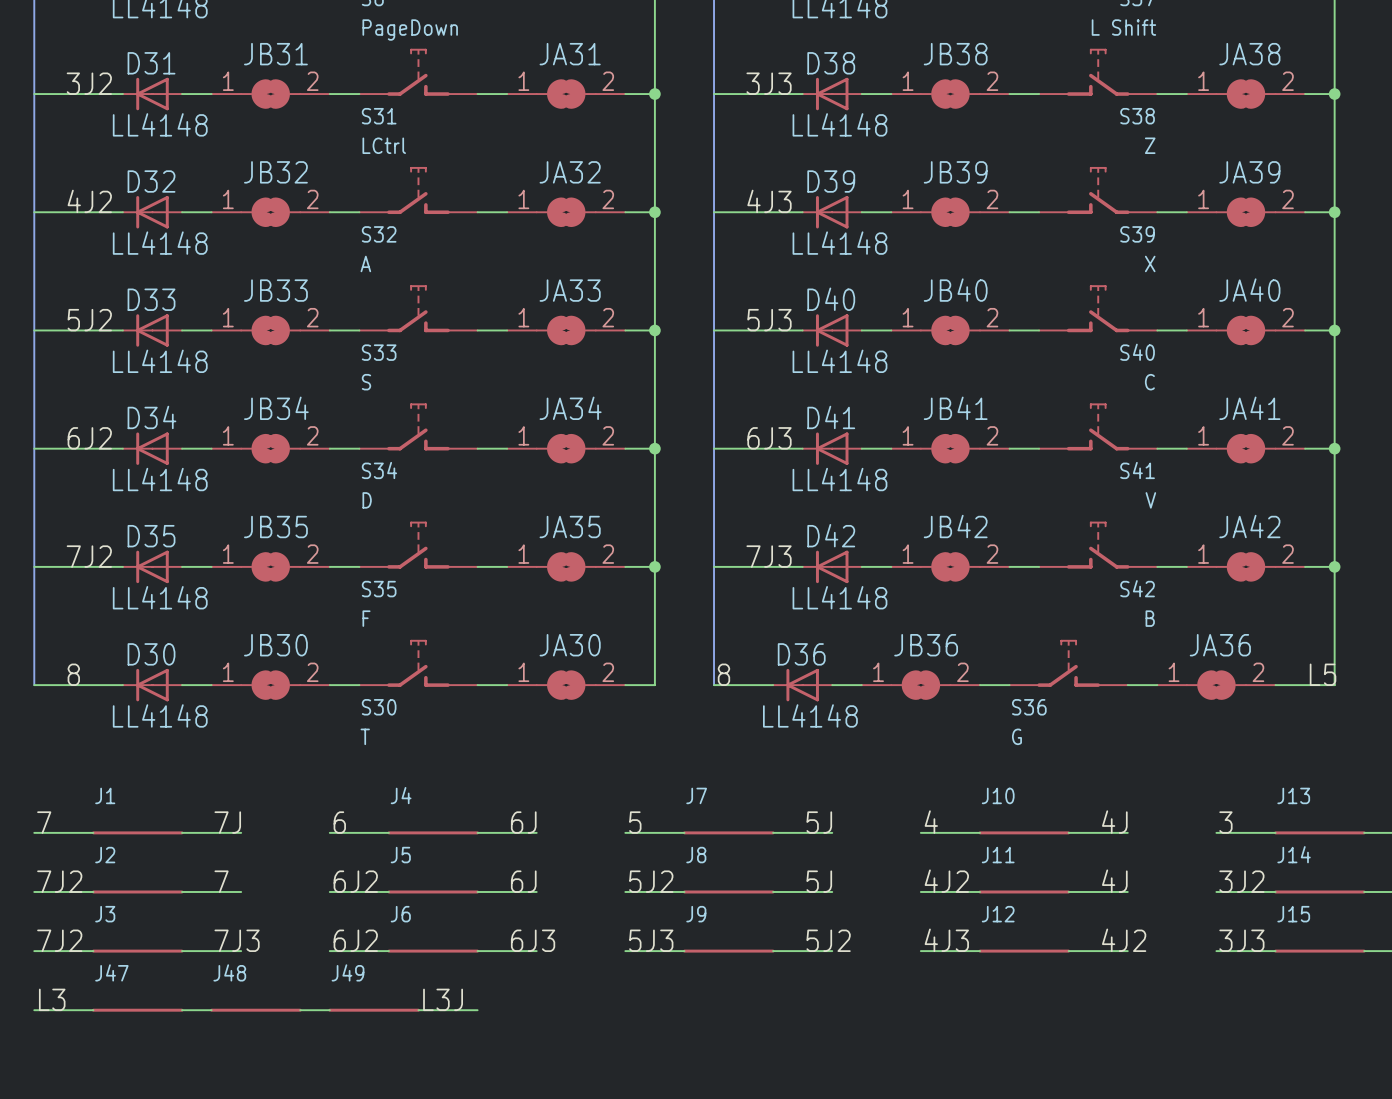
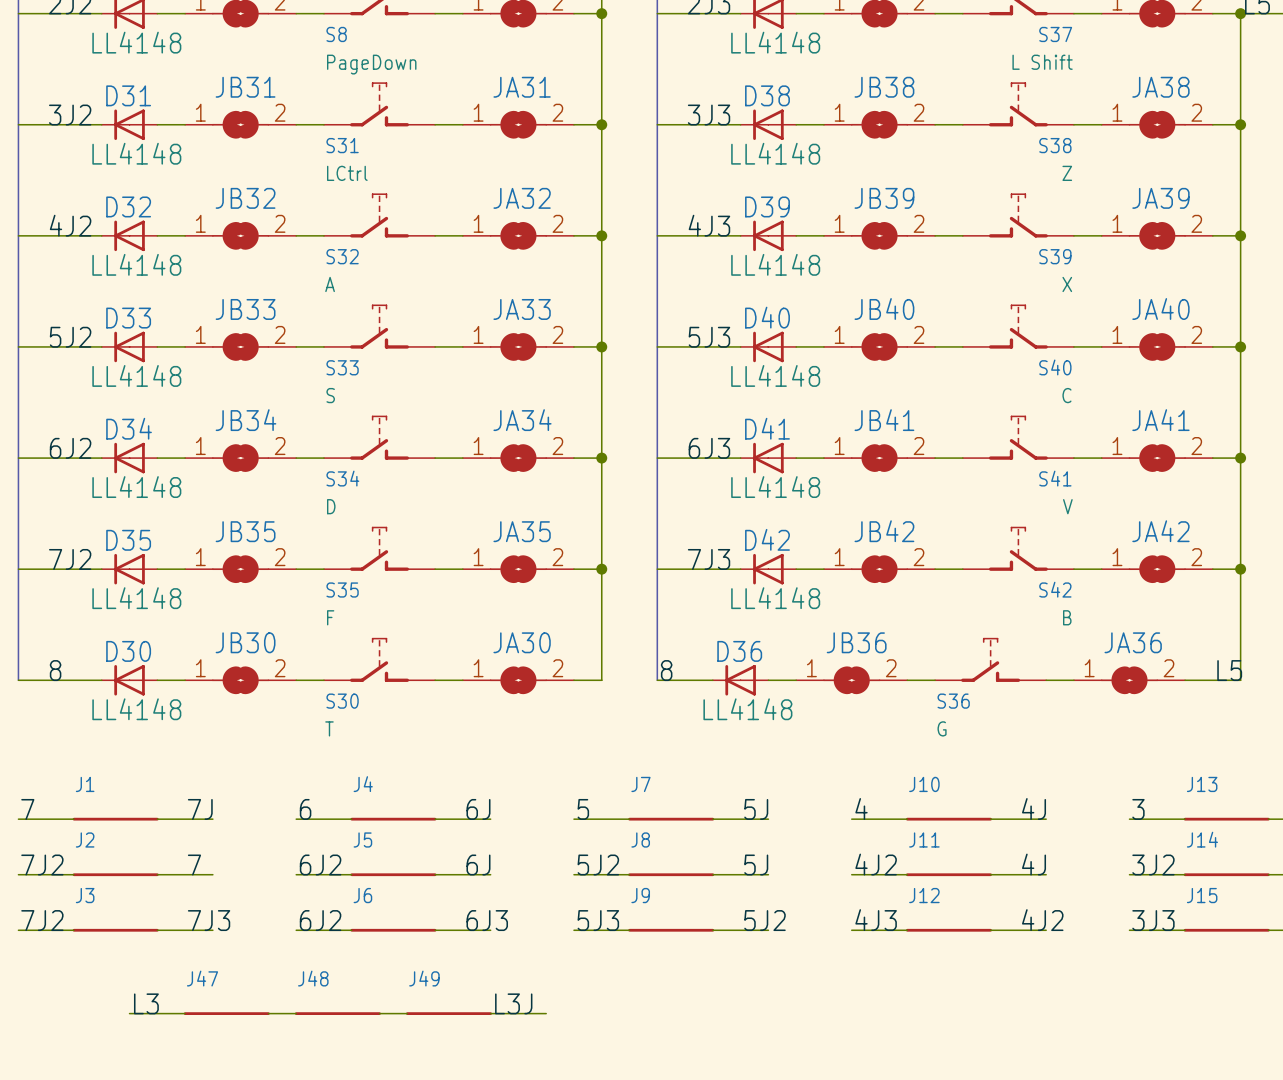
label position: L3 (52, 999) -> L3 (146, 1003)
label position: L3J (443, 999) -> L3J (513, 1003)
wire: (34, 1010) (93, 1010) -> (129, 1013) (185, 1013)
J47 position: (137, 1010) -> (226, 1013)
wire: (182, 1010) (211, 1010) -> (268, 1013) (296, 1013)
J48 position: (255, 1010) -> (337, 1013)
wire: (300, 1010) (329, 1010) -> (379, 1013) (407, 1013)
J49 position: (374, 1010) -> (448, 1013)
wire: (418, 1010) (477, 1010) -> (490, 1013) (546, 1013)

